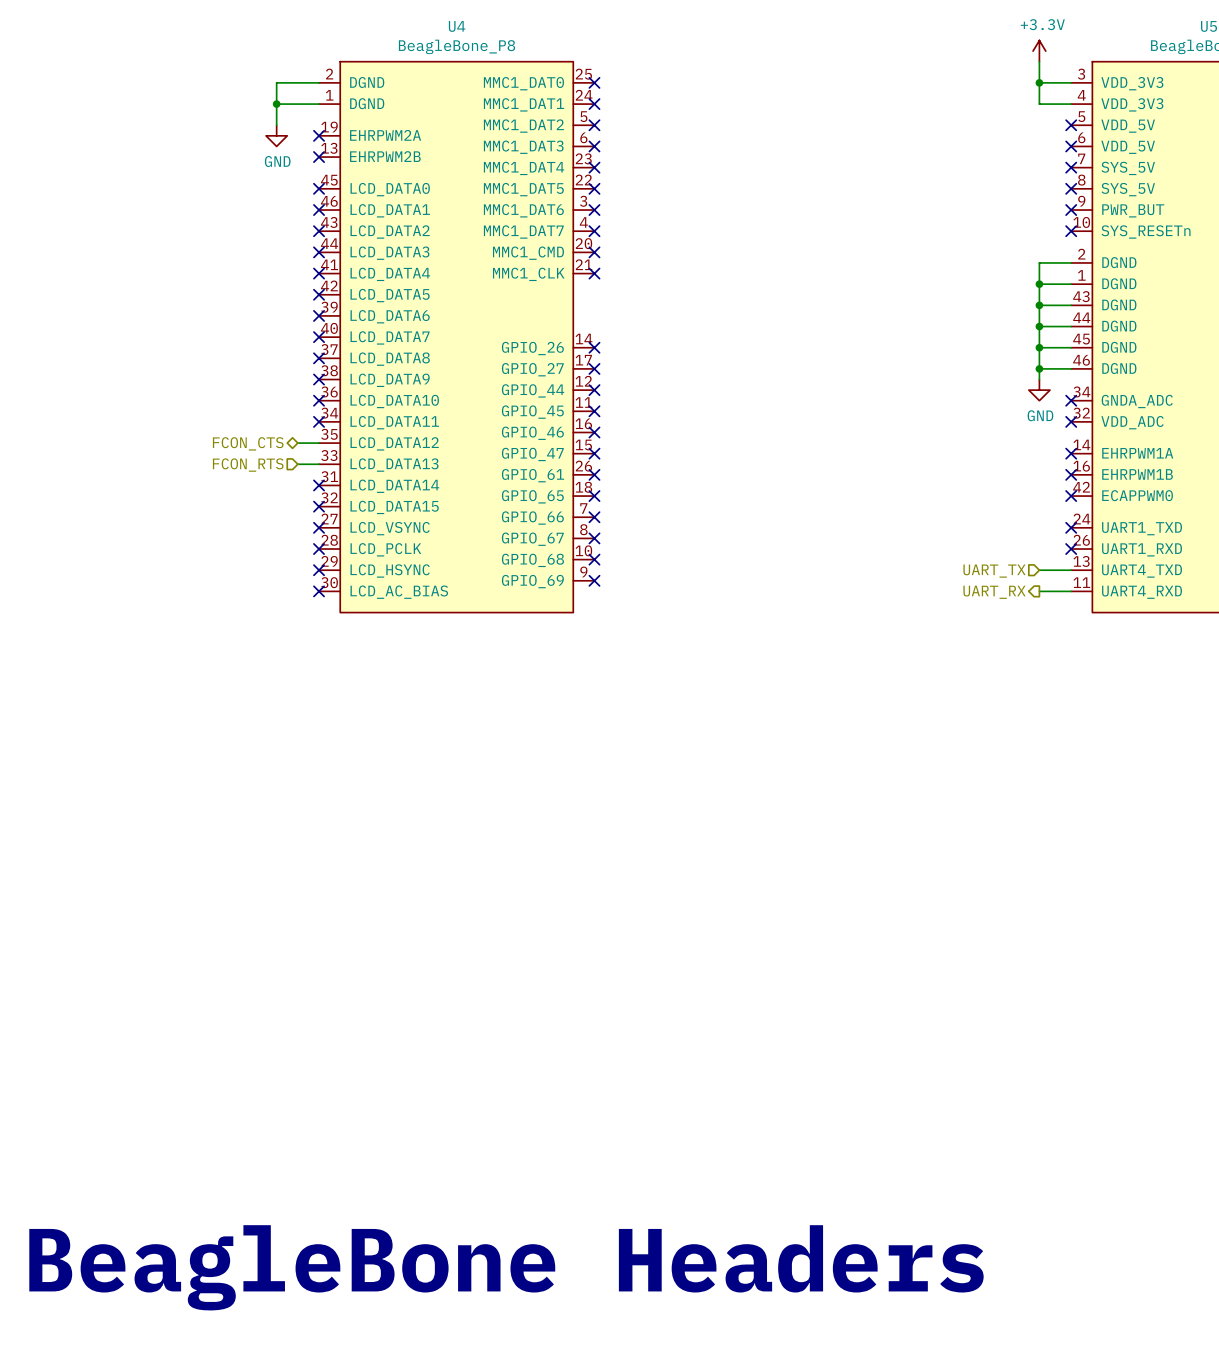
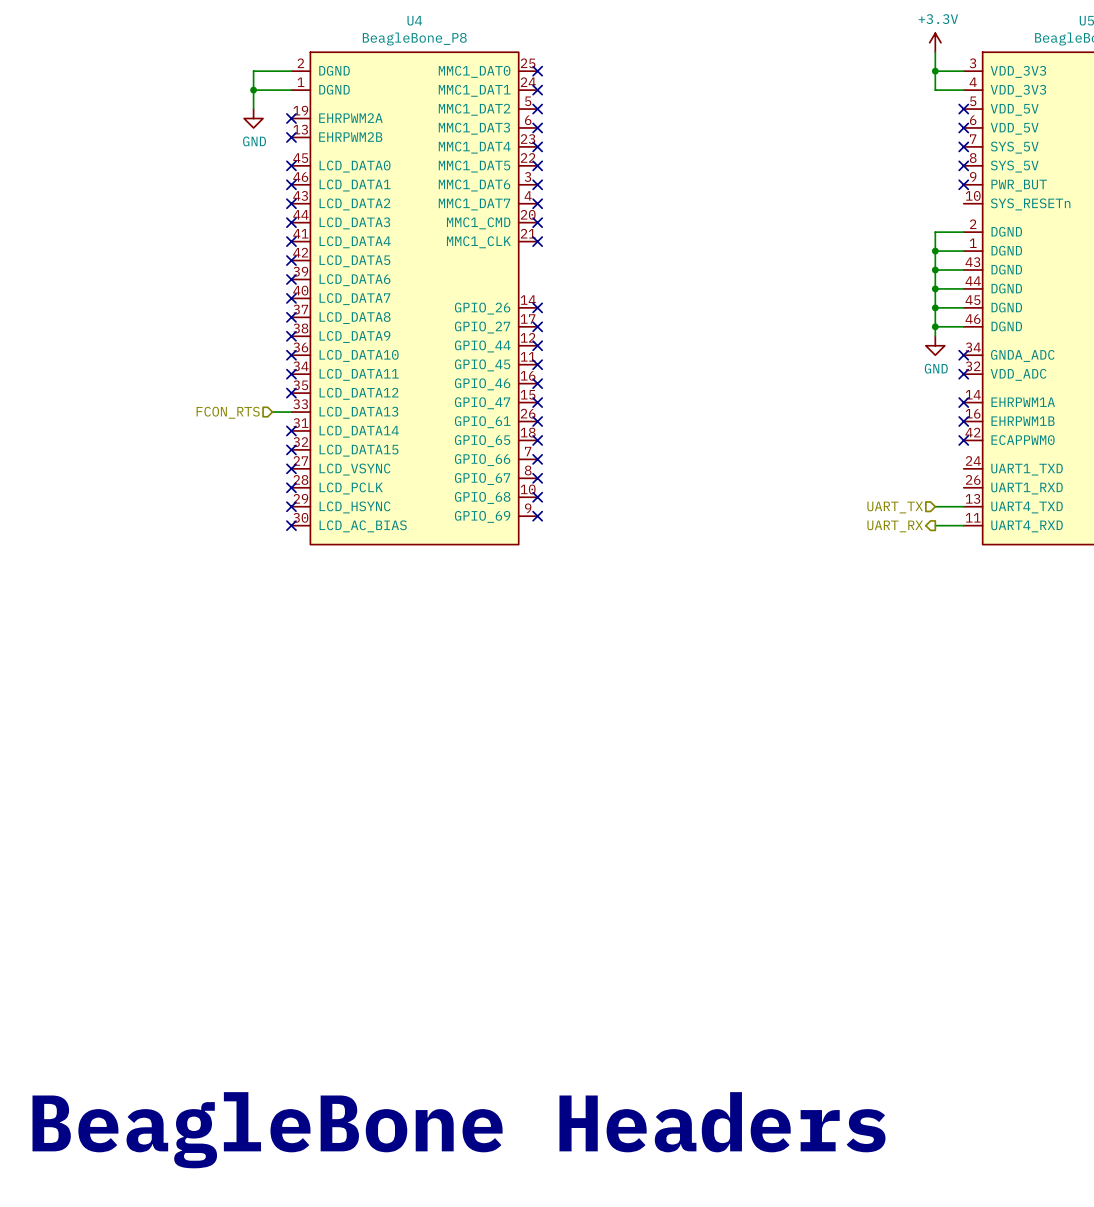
no-connect mark: (1071, 231) -> none
hierarchical label: FCON_CTS (248, 443) -> none
wire: (297, 443) (319, 443) -> none
no-connect mark: none -> (291, 393)
no-connect mark: (1071, 527) -> none
no-connect mark: (1071, 549) -> none

